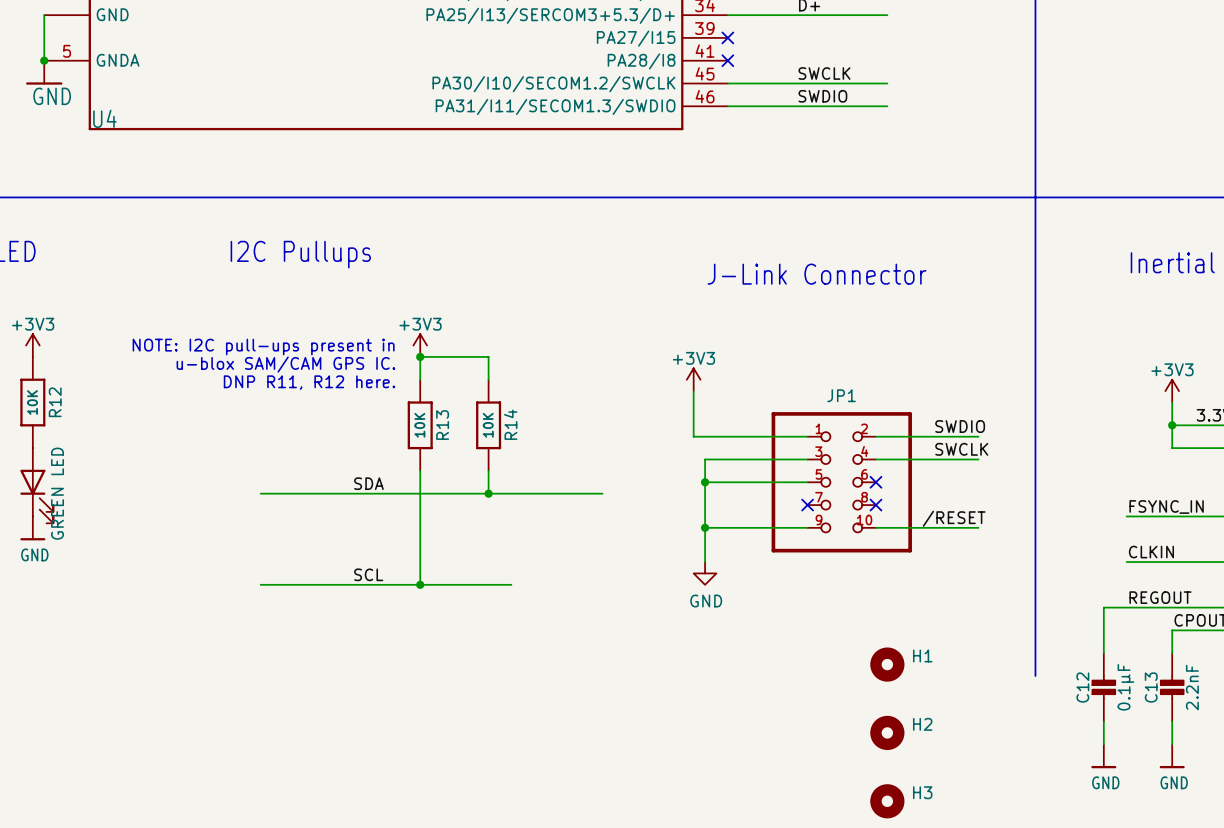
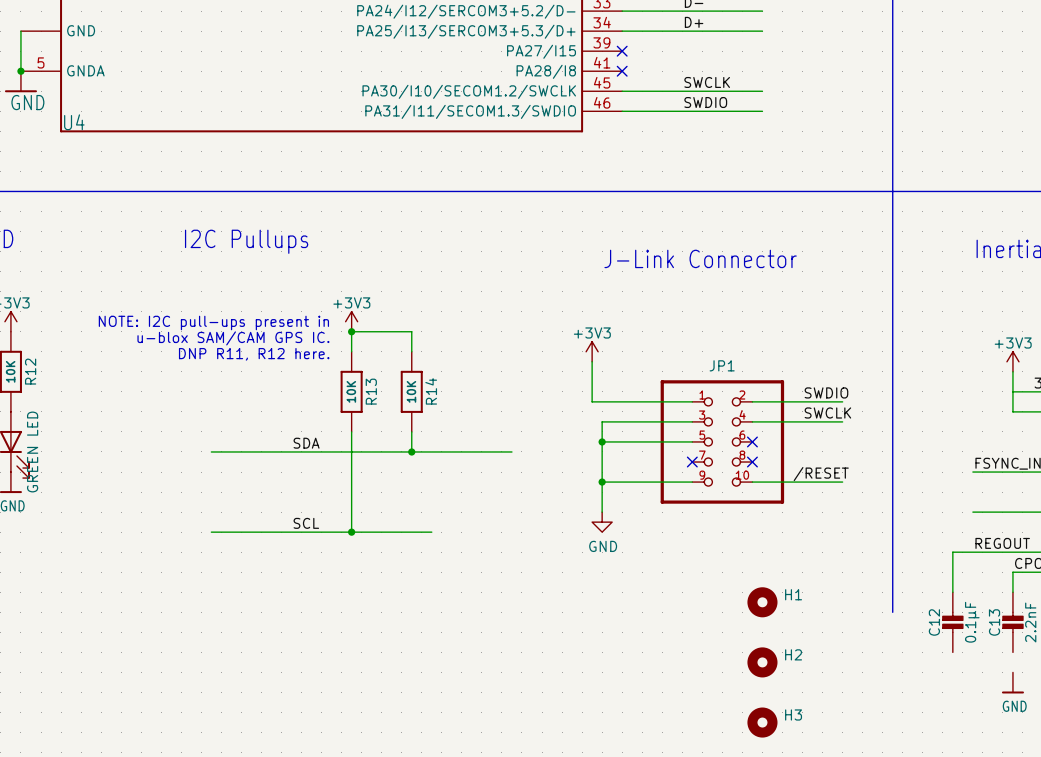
junction: (1172, 425) -> none
label: CLKIN (1151, 552) -> none
wire: (1103, 721) (1103, 744) -> none
wire: (1172, 721) (1172, 744) -> none
power symbol: GND (1103, 756) -> none

